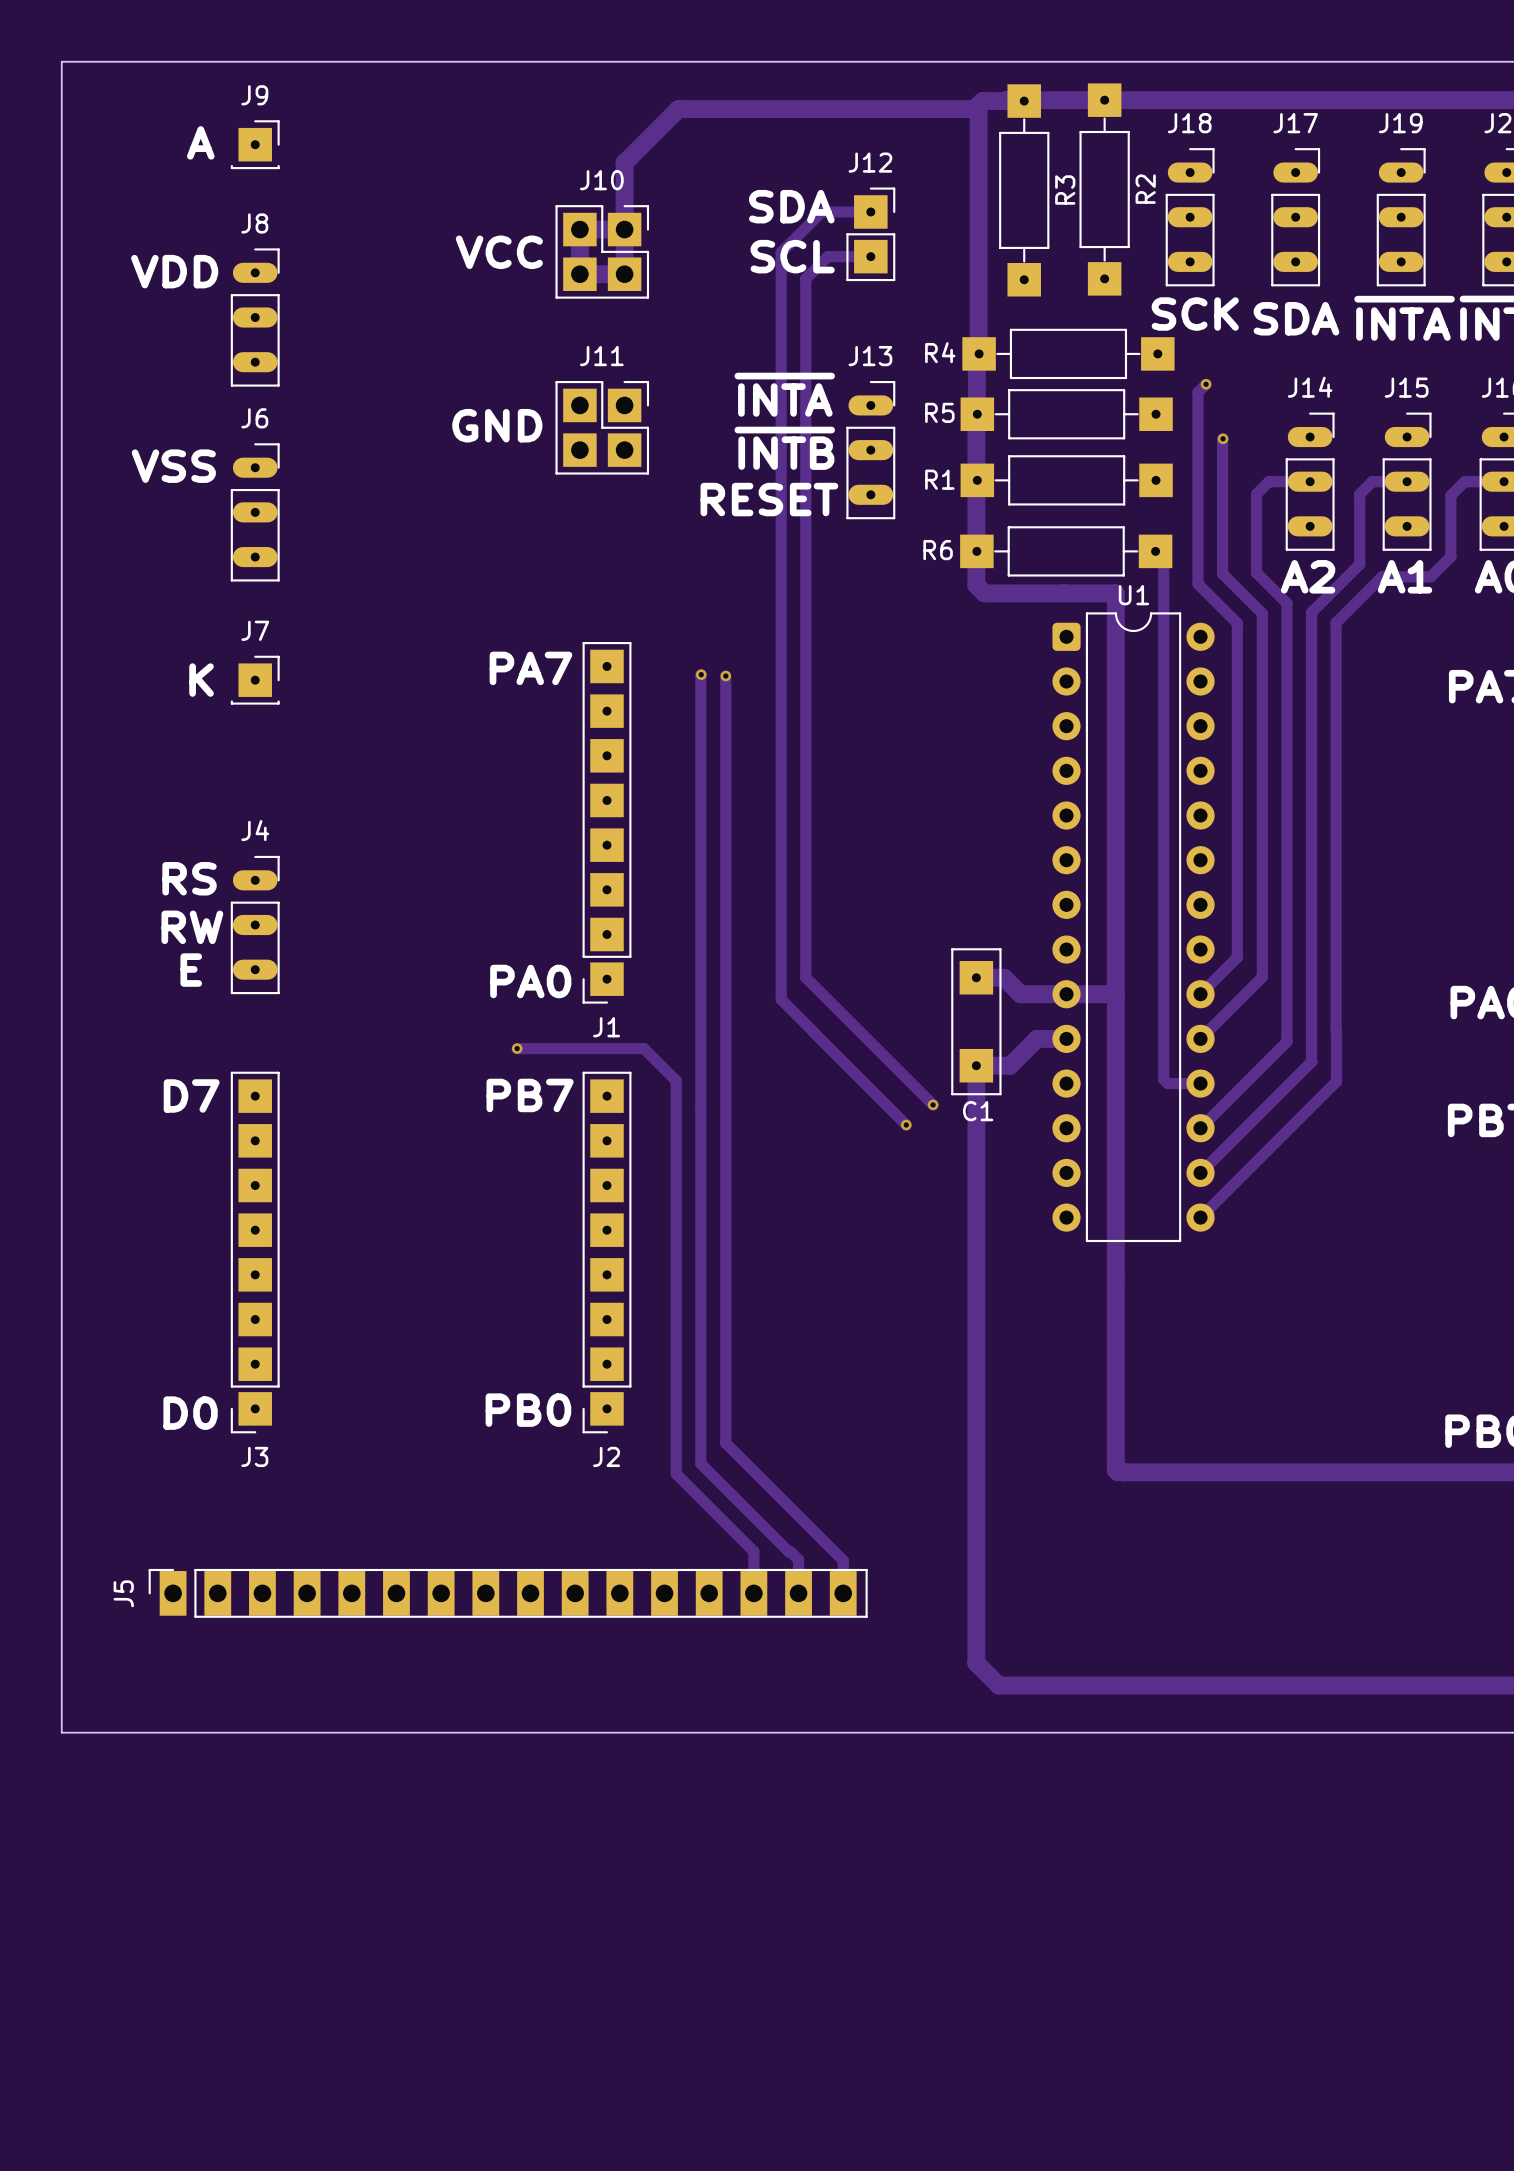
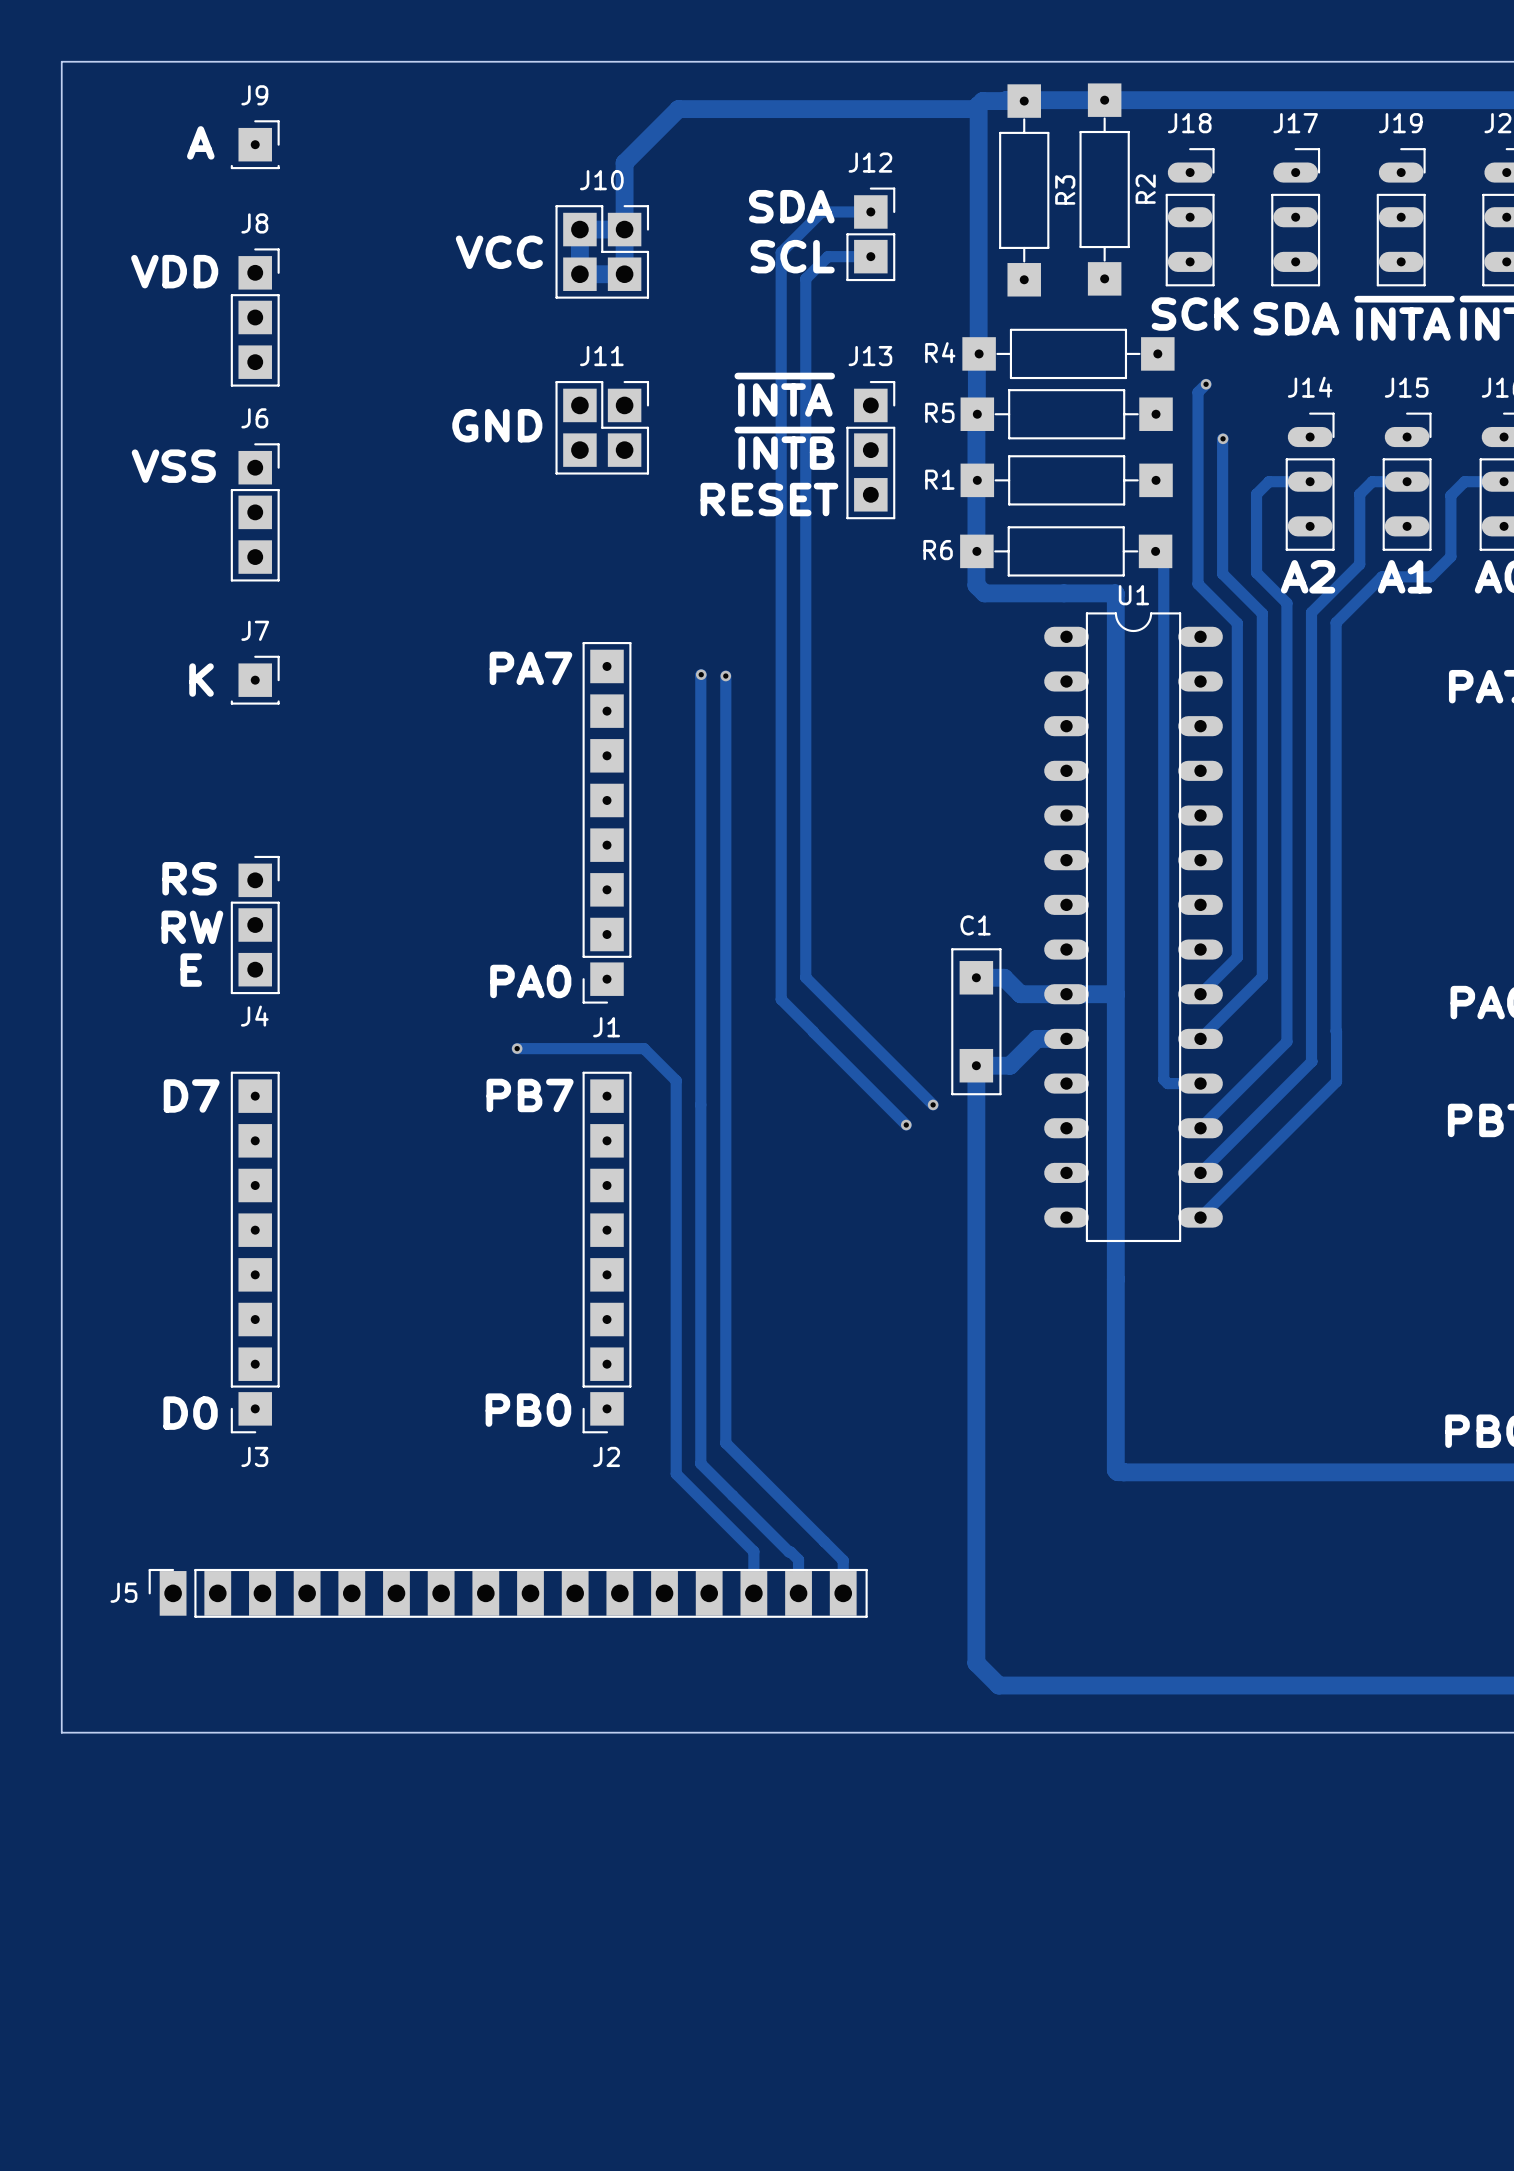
J8 footprint: [230, 248, 280, 387] -> [230, 248, 280, 387]
J13 footprint: [846, 380, 896, 520] -> [846, 380, 896, 520]
J6 footprint: [230, 443, 280, 582] -> [230, 443, 280, 582]
U1 footprint: [1052, 612, 1215, 1243] -> [1044, 612, 1223, 1243]
J4 name position: J4 (255, 830) -> J4 (254, 1016)
J4 footprint: [230, 855, 280, 995] -> [230, 855, 280, 995]
C1 name position: C1 (978, 1111) -> C1 (975, 925)
J5 name rotation: 0° (123, 1593) -> 90° clockwise (123, 1592)

